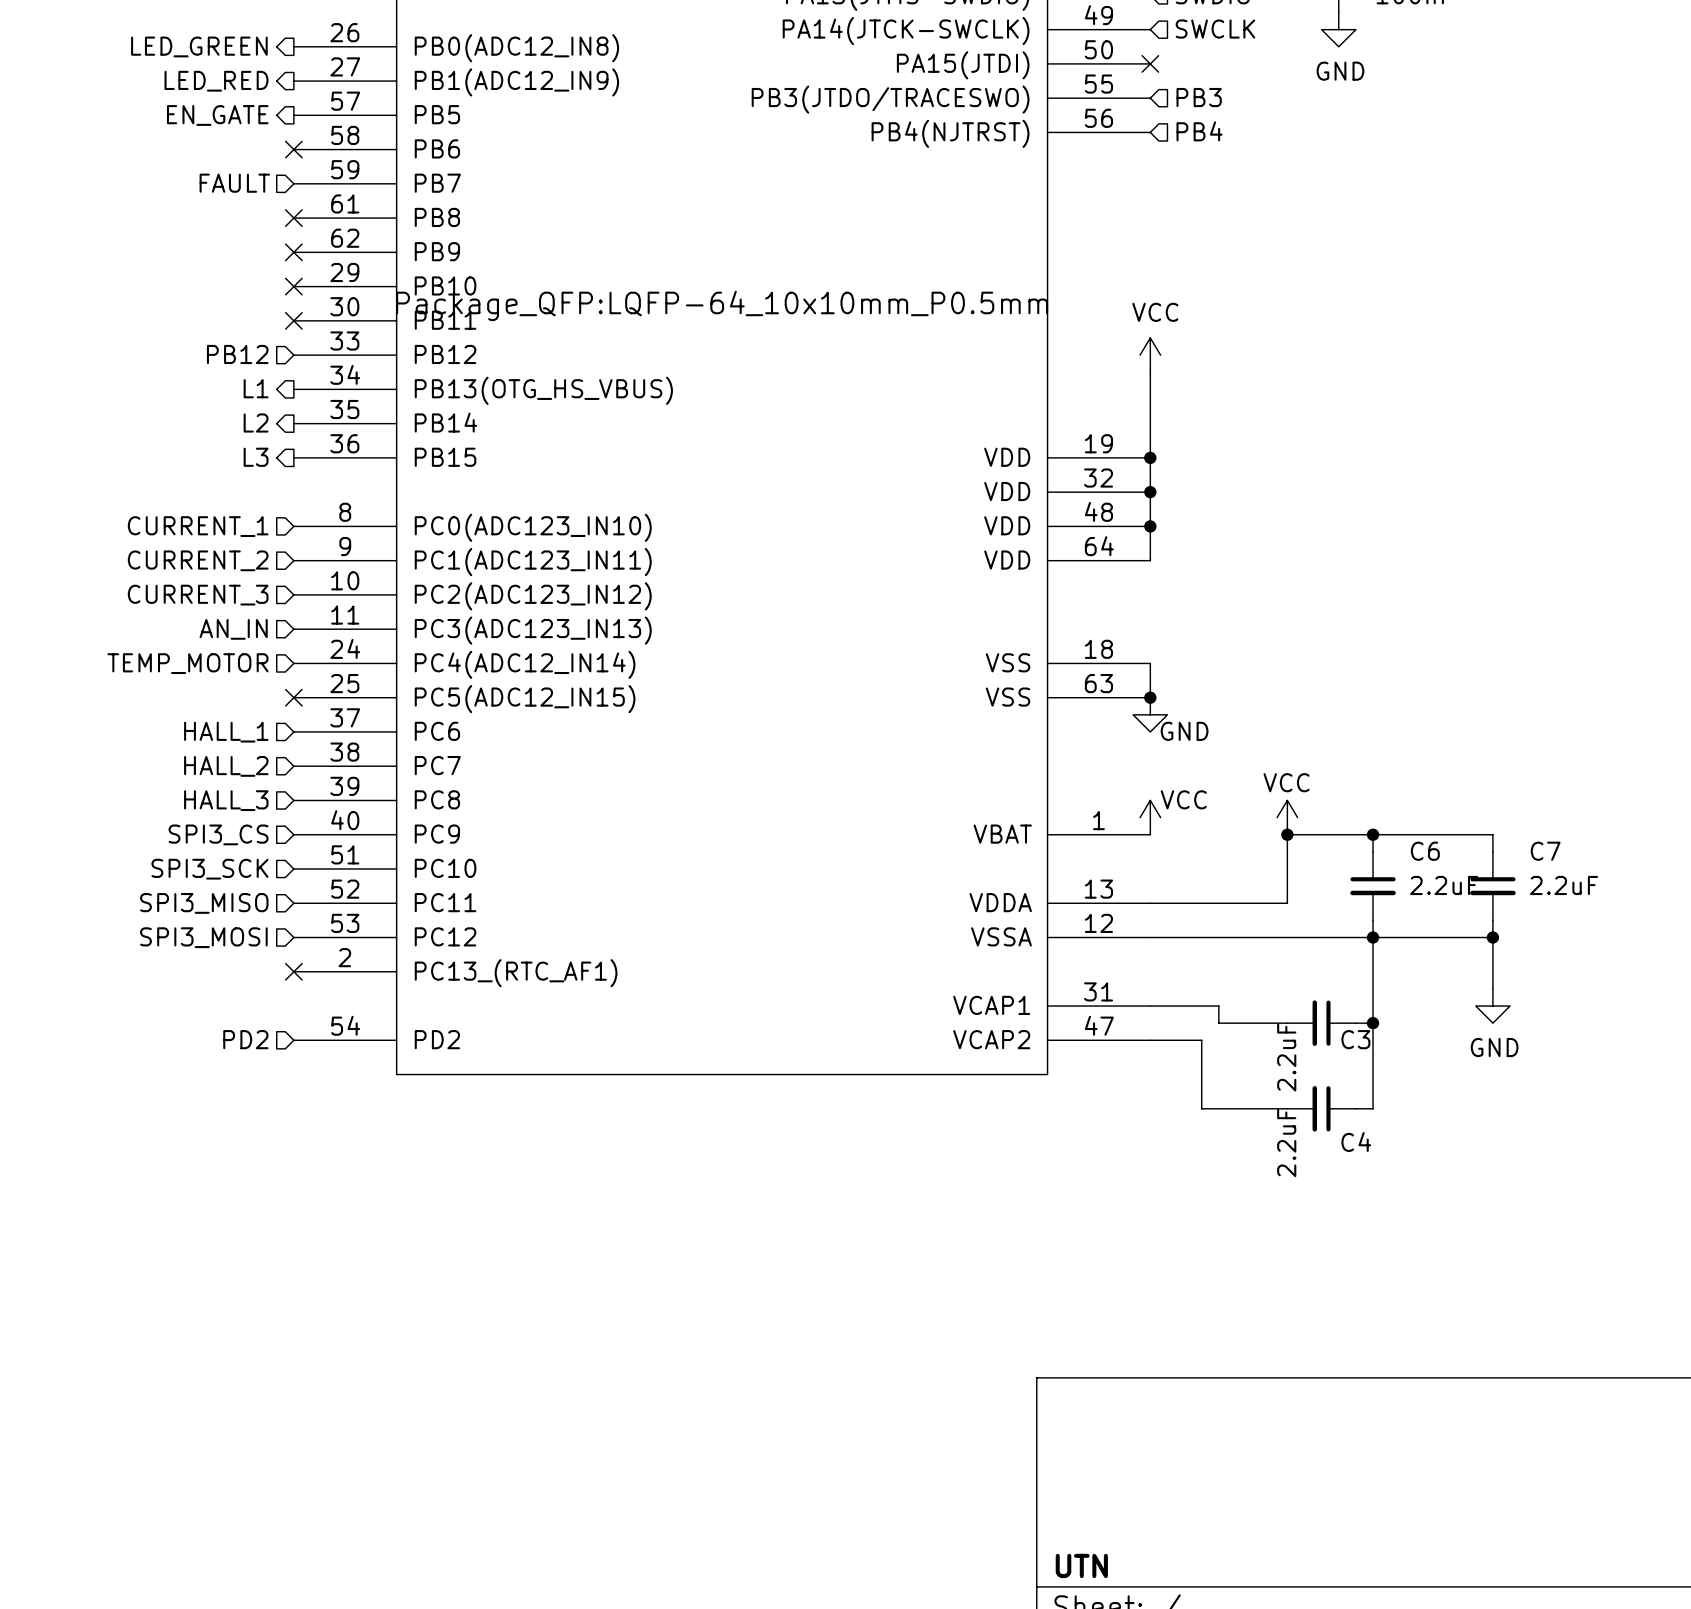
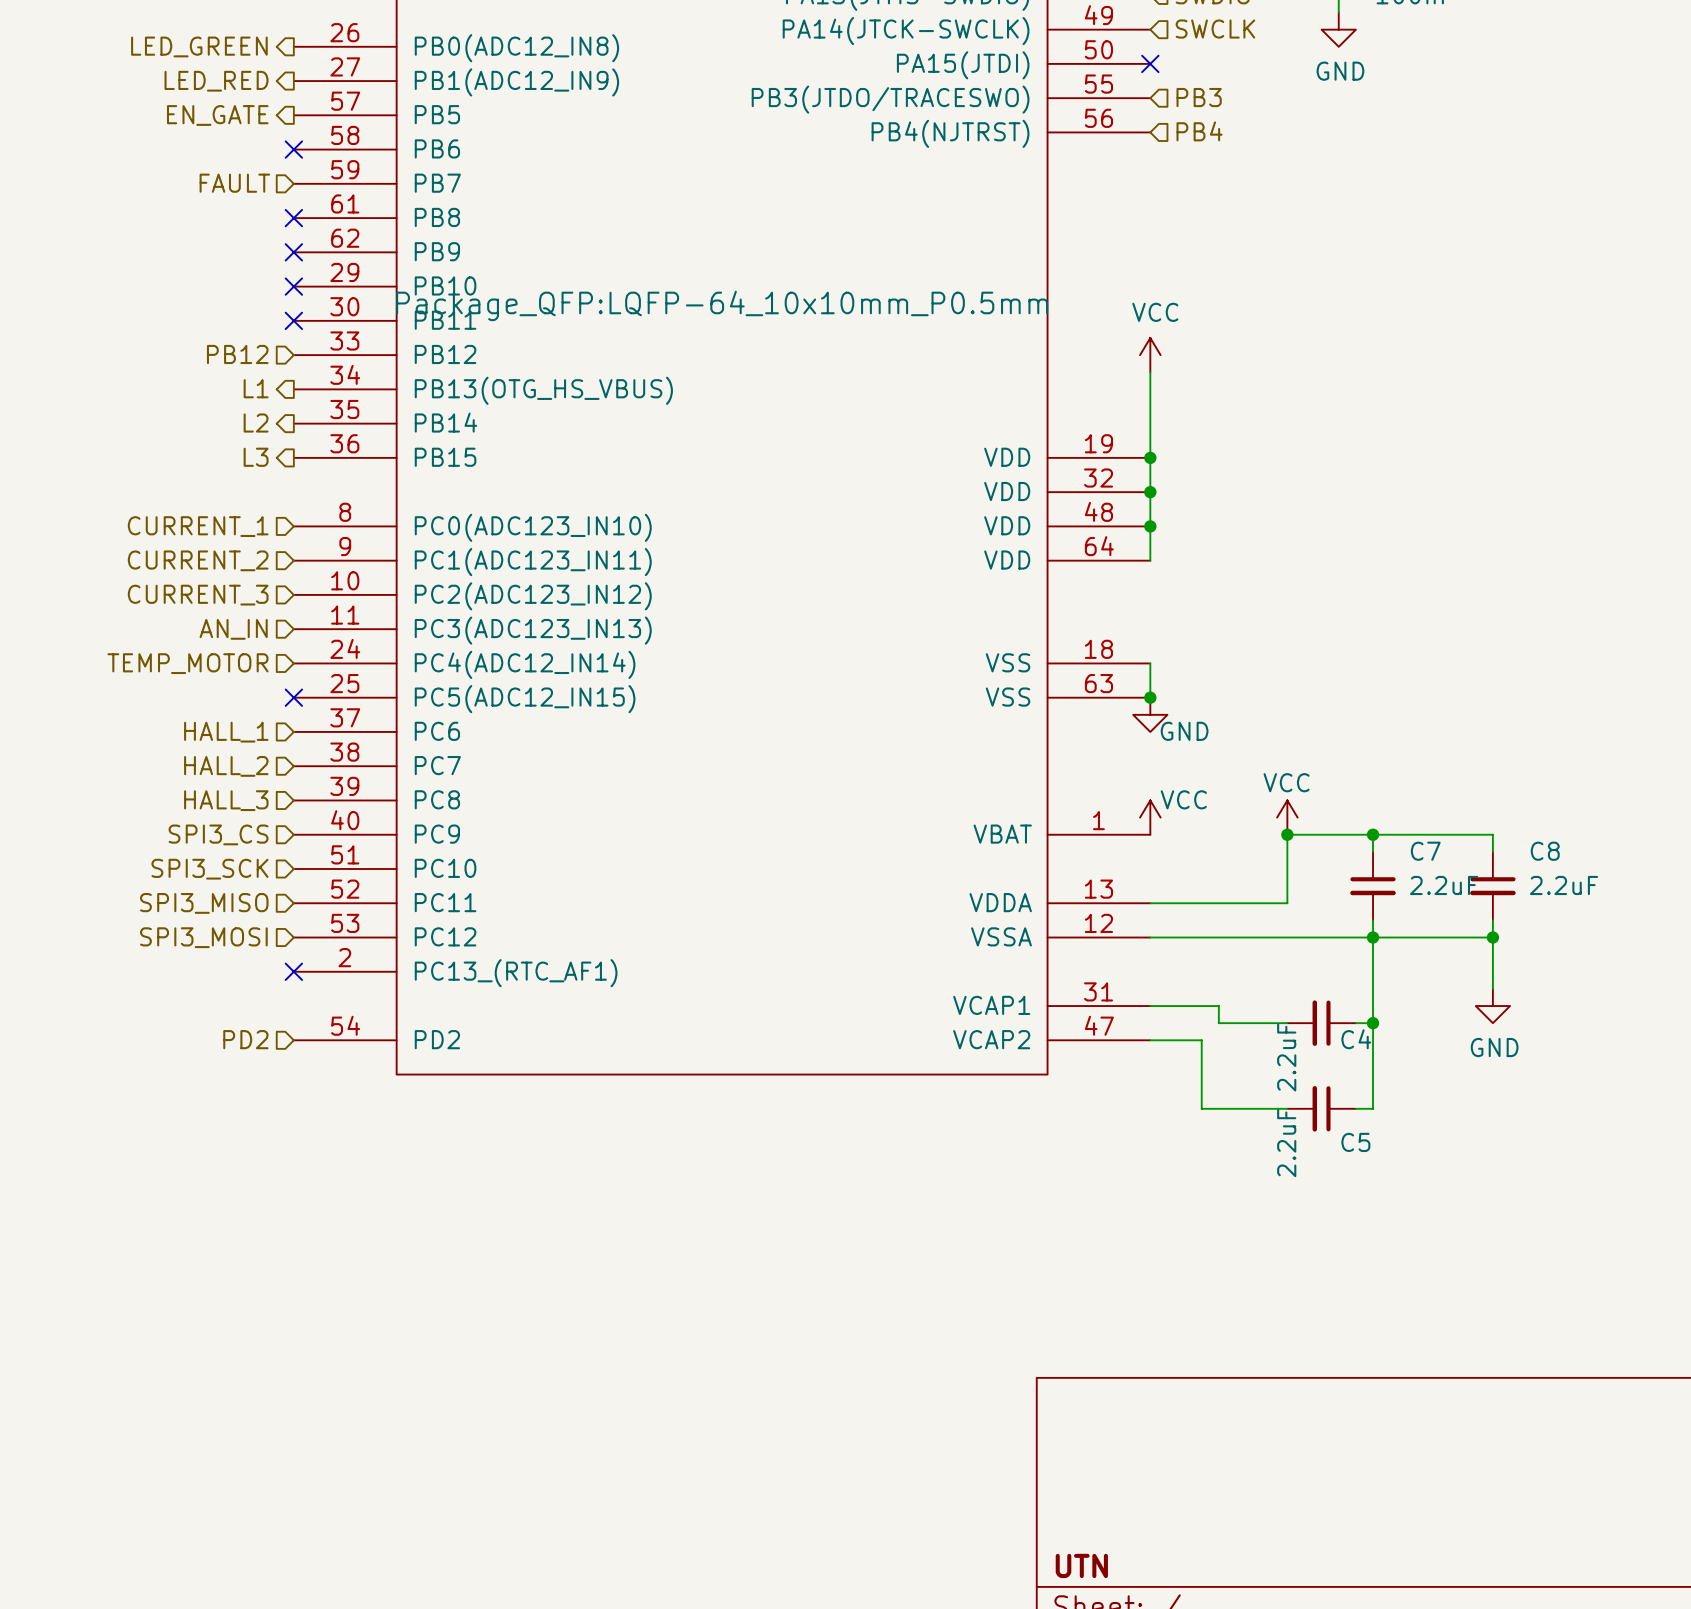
C6 name: C6 (1425, 851) -> C7 (1425, 851)
C7 name: C7 (1545, 851) -> C8 (1545, 851)
C3 name: C3 (1355, 1039) -> C4 (1356, 1039)
C4 name: C4 (1356, 1142) -> C5 (1355, 1142)

